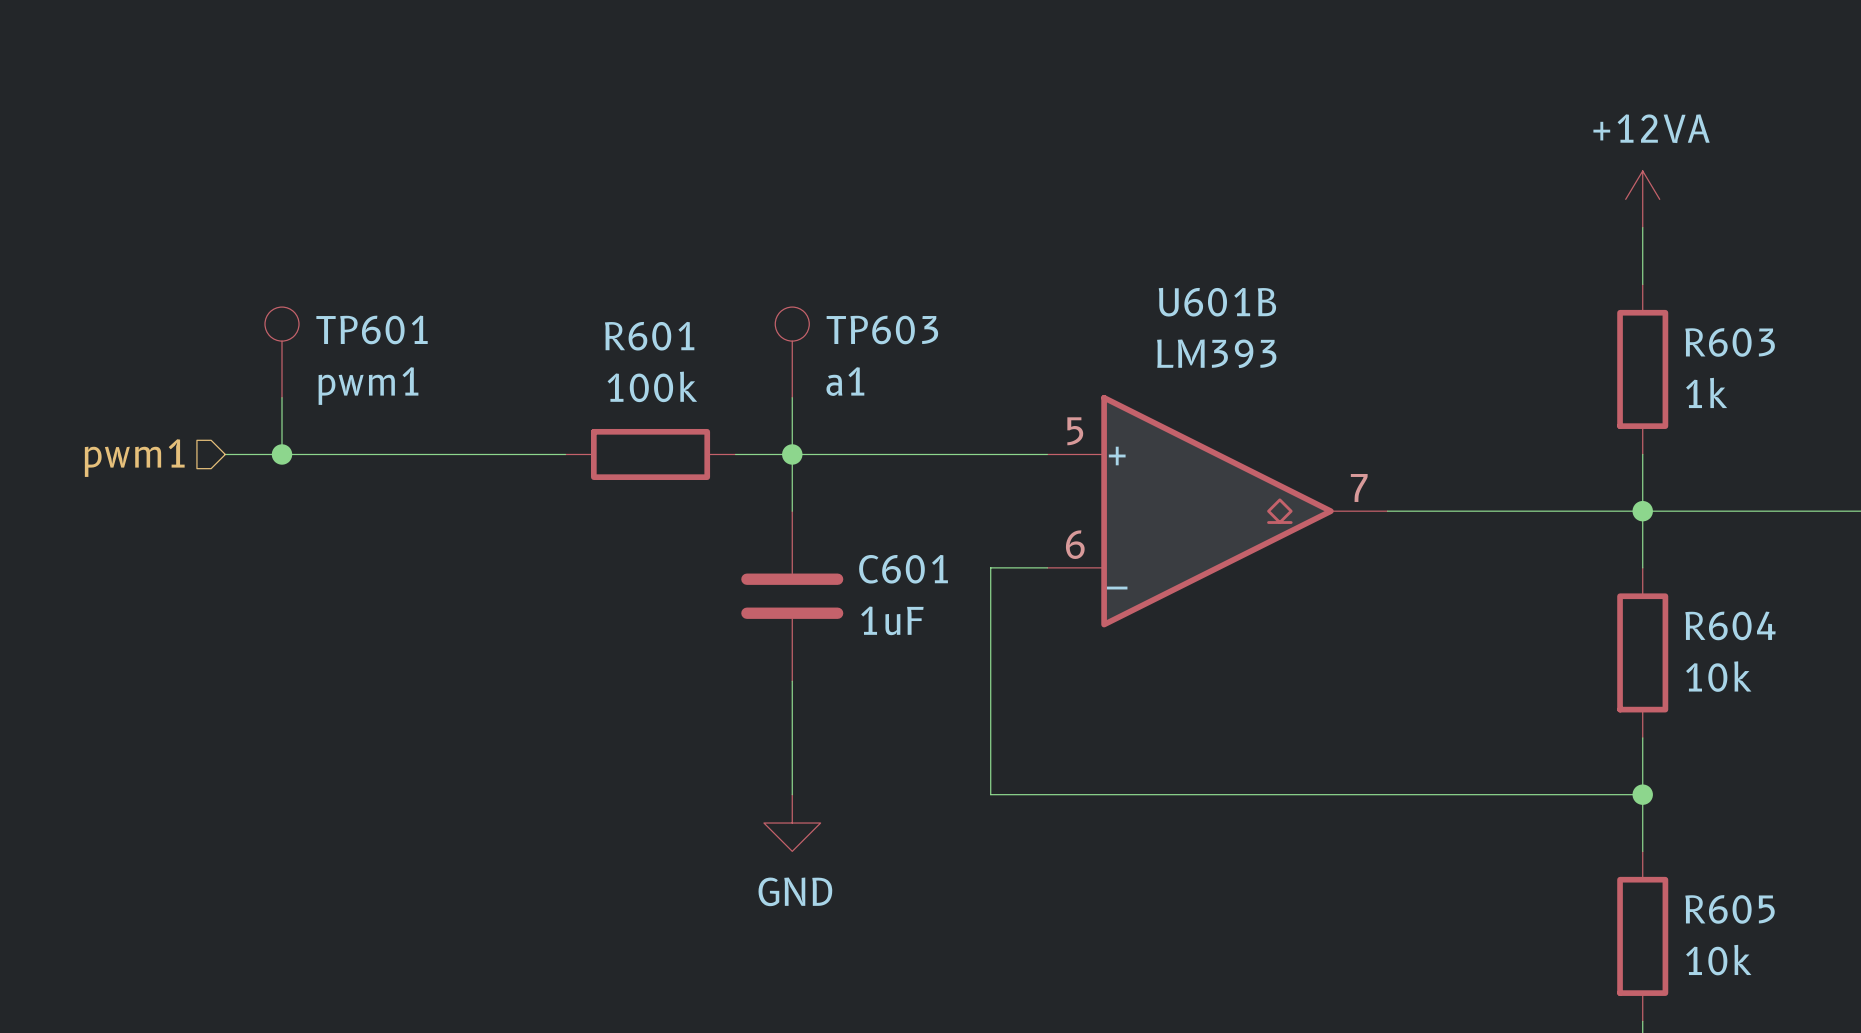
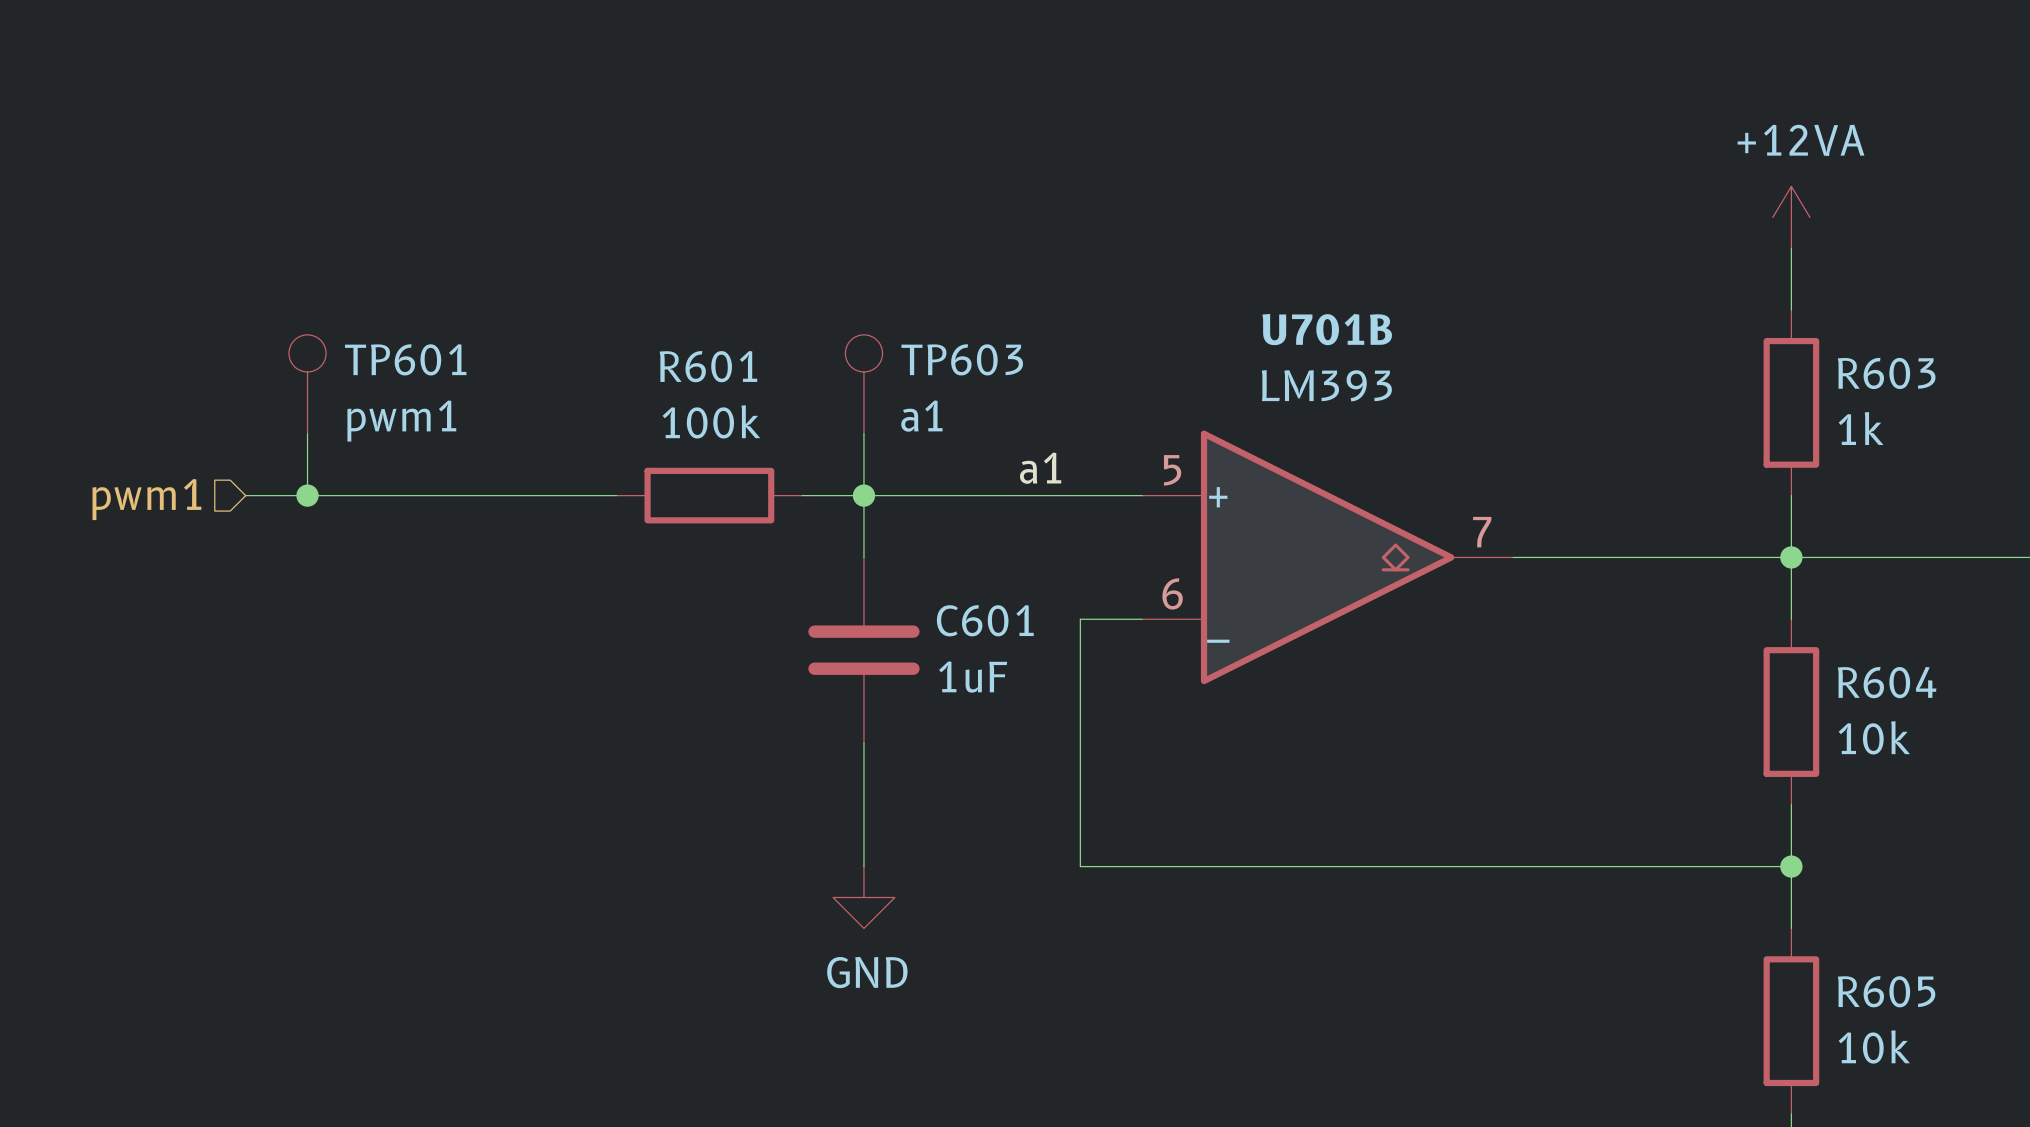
U601B name: U601B (1217, 302) -> U701B (1327, 329)
label: none -> a1 (1040, 468)

